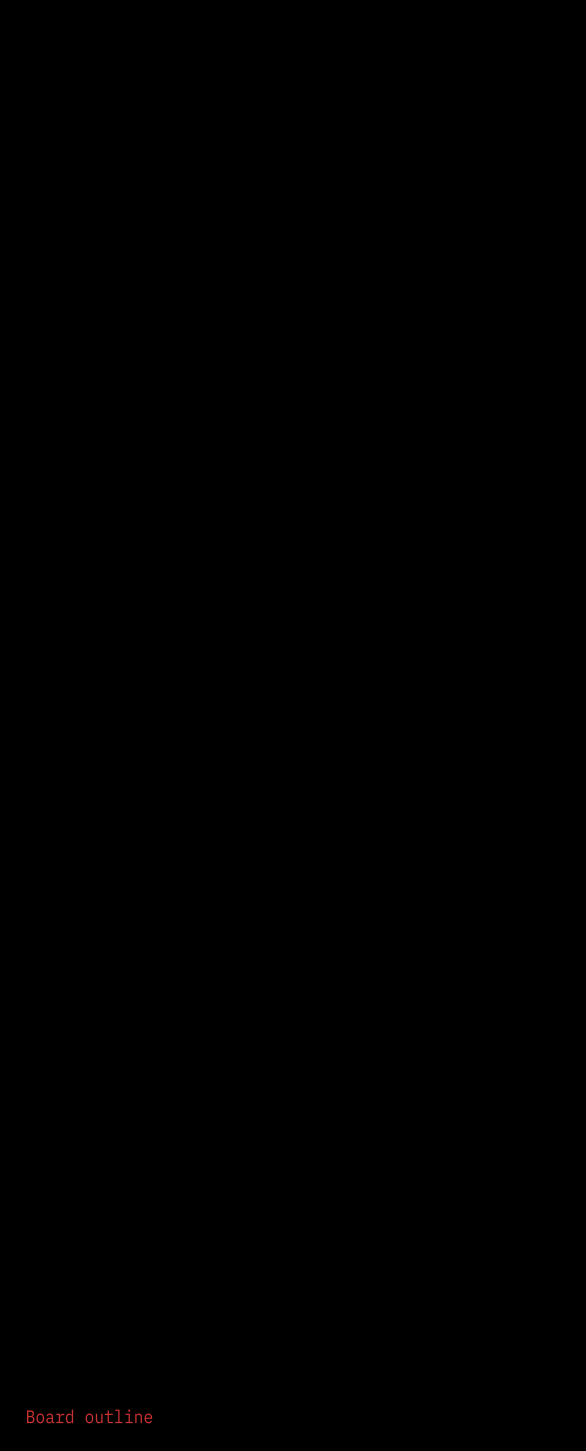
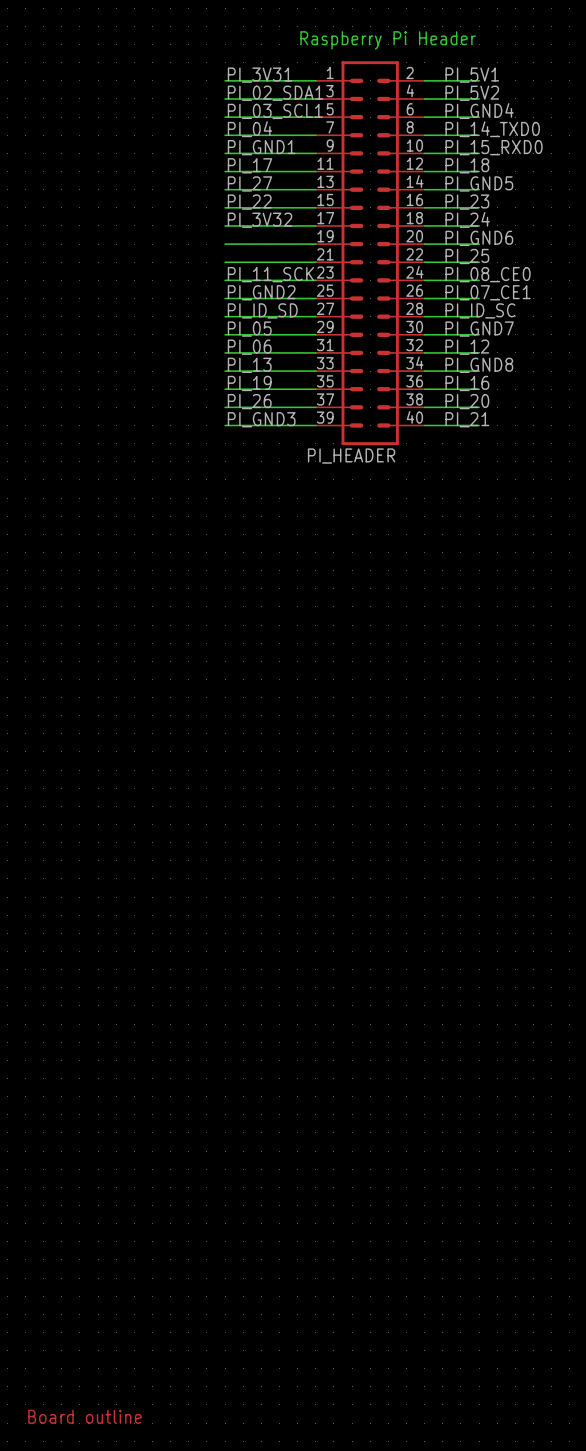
text: none -> Raspberry Pi Header (388, 40)
label: none -> PI_3V31 (260, 75)
label: none -> PI_5V1 (472, 75)
wire: none -> (225, 80) (315, 80)
wire: none -> (424, 80) (479, 80)
label: none -> PI_02_SDA1 (275, 93)
label: none -> PI_5V2 (472, 93)
wire: none -> (225, 98) (315, 98)
wire: none -> (424, 98) (479, 98)
label: none -> PI_03_SCL1 (275, 111)
label: none -> PI_GND4 (479, 111)
wire: none -> (225, 117) (315, 117)
wire: none -> (424, 117) (479, 117)
label: none -> PI_04 (249, 129)
label: none -> PI_14_TXD0 (492, 129)
wire: none -> (225, 135) (315, 135)
wire: none -> (424, 135) (479, 135)
label: none -> PI_GND1 (261, 147)
label: none -> PI_15_RXD0 (494, 147)
wire: none -> (225, 153) (315, 153)
wire: none -> (424, 153) (479, 153)
label: none -> PI_17 (249, 165)
label: none -> PI_18 (467, 165)
wire: none -> (225, 171) (315, 171)
wire: none -> (424, 171) (479, 171)
label: none -> PI_27 (249, 183)
label: none -> PI_GND5 (479, 183)
wire: none -> (225, 189) (315, 189)
wire: none -> (424, 189) (479, 189)
label: none -> PI_22 (249, 202)
label: none -> PI_23 (467, 202)
wire: none -> (225, 207) (315, 207)
wire: none -> (424, 207) (479, 207)
label: none -> PI_3V32 (260, 220)
label: none -> PI_24 (467, 219)
wire: none -> (225, 225) (315, 225)
wire: none -> (424, 225) (479, 225)
label: none -> PI_GND6 (479, 238)
wire: none -> (225, 244) (315, 244)
wire: none -> (424, 244) (479, 244)
PI_HEADER: none -> (370, 253)
label: none -> PI_25 (467, 256)
wire: none -> (225, 262) (315, 262)
wire: none -> (424, 262) (479, 262)
label: none -> PI_11_SCK (270, 274)
label: none -> PI_08_CE0 (488, 274)
wire: none -> (225, 280) (315, 280)
wire: none -> (424, 280) (479, 280)
label: none -> PI_GND2 (261, 292)
label: none -> PI_07_CE1 (488, 292)
wire: none -> (225, 298) (315, 298)
wire: none -> (424, 298) (479, 298)
label: none -> PI_ID_SD (262, 310)
label: none -> PI_ID_SC (480, 310)
wire: none -> (225, 316) (315, 316)
wire: none -> (424, 316) (479, 316)
label: none -> PI_05 (249, 329)
label: none -> PI_GND7 (479, 329)
wire: none -> (225, 334) (315, 334)
wire: none -> (424, 334) (479, 334)
label: none -> PI_06 (249, 347)
label: none -> PI_12 (467, 347)
wire: none -> (225, 352) (315, 352)
wire: none -> (424, 352) (479, 352)
label: none -> PI_13 (249, 365)
label: none -> PI_GND8 (479, 365)
wire: none -> (225, 371) (315, 371)
wire: none -> (424, 371) (479, 371)
label: none -> PI_19 (249, 383)
label: none -> PI_16 (467, 383)
wire: none -> (225, 389) (315, 389)
wire: none -> (424, 389) (479, 389)
label: none -> PI_26 (249, 401)
label: none -> PI_20 (467, 401)
wire: none -> (225, 407) (315, 407)
wire: none -> (424, 407) (479, 407)
label: none -> PI_GND3 (261, 419)
label: none -> PI_21 (467, 419)
wire: none -> (225, 425) (315, 425)
wire: none -> (424, 425) (479, 425)

